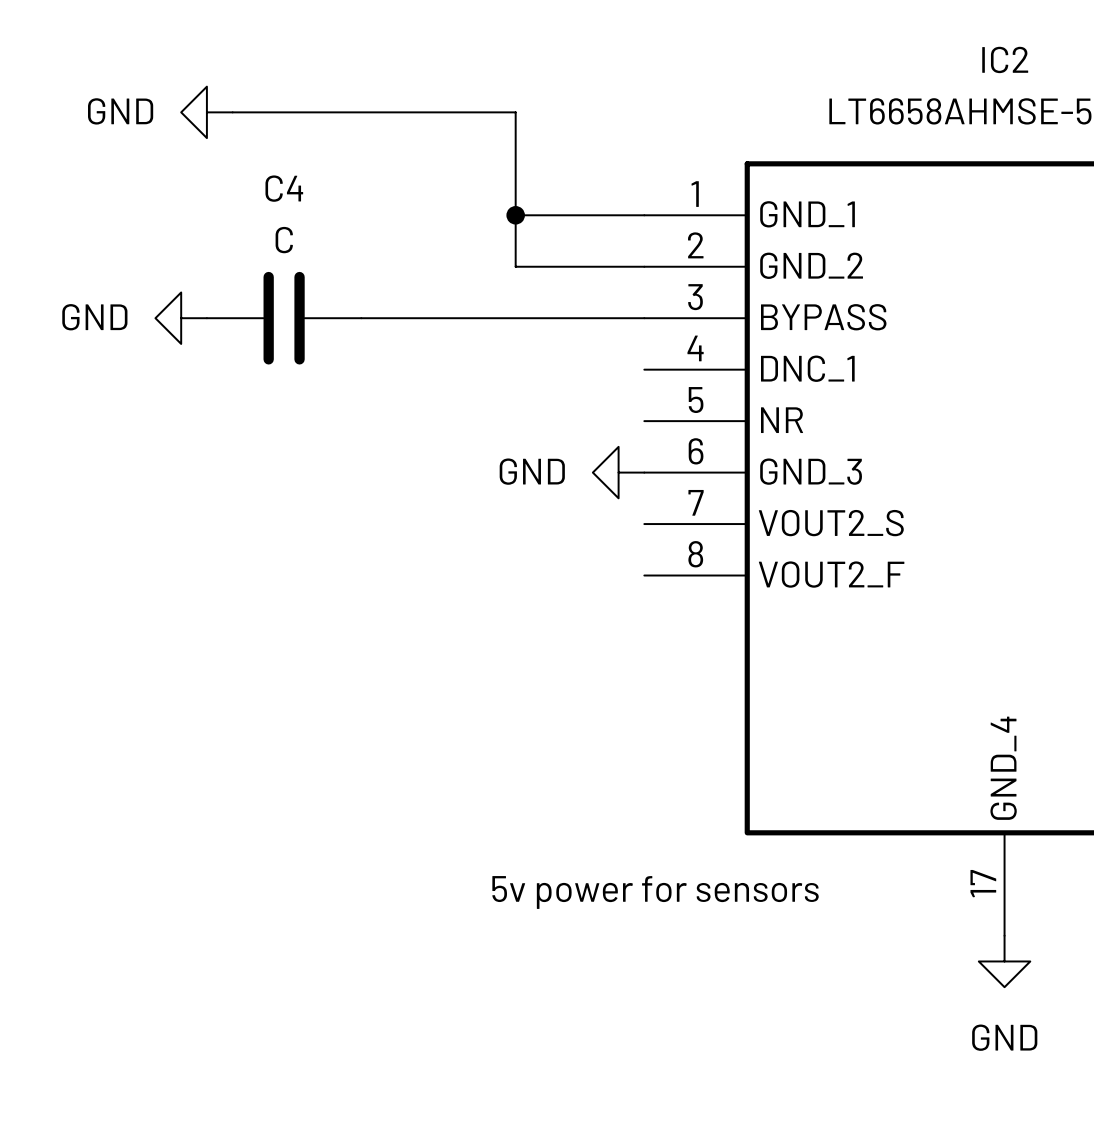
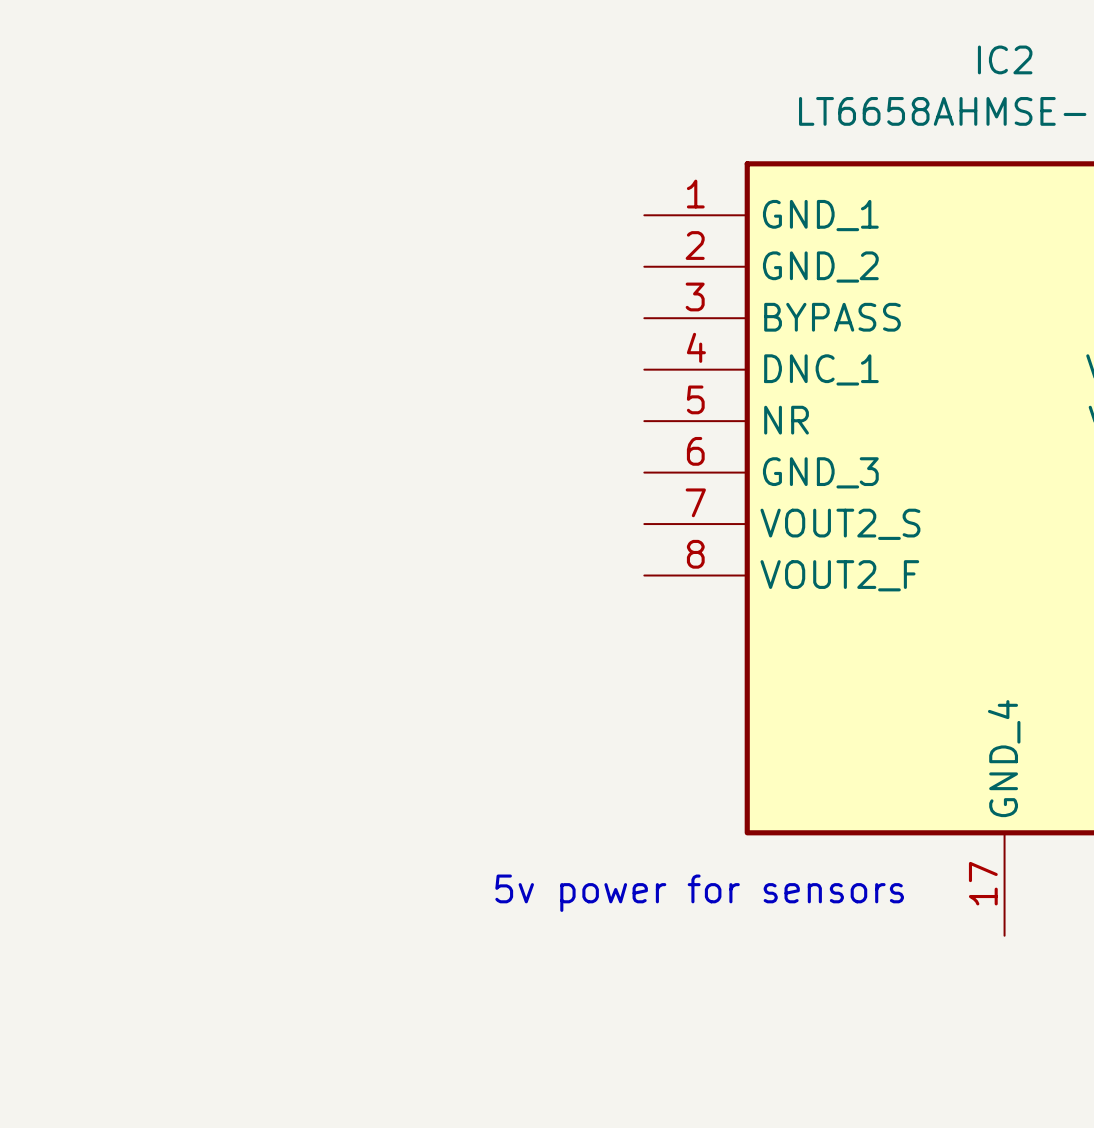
power symbol: GND (206, 112) -> none
wire: (232, 112) (515, 112) (515, 266) (644, 266) -> none
wire: (515, 215) (644, 215) -> none
junction: (515, 215) -> none
power symbol: GND (181, 318) -> none
C4: C (284, 318) -> none
wire: (361, 318) (644, 318) -> none
power symbol: GND (618, 472) -> none
power symbol: GND (1004, 961) -> none

